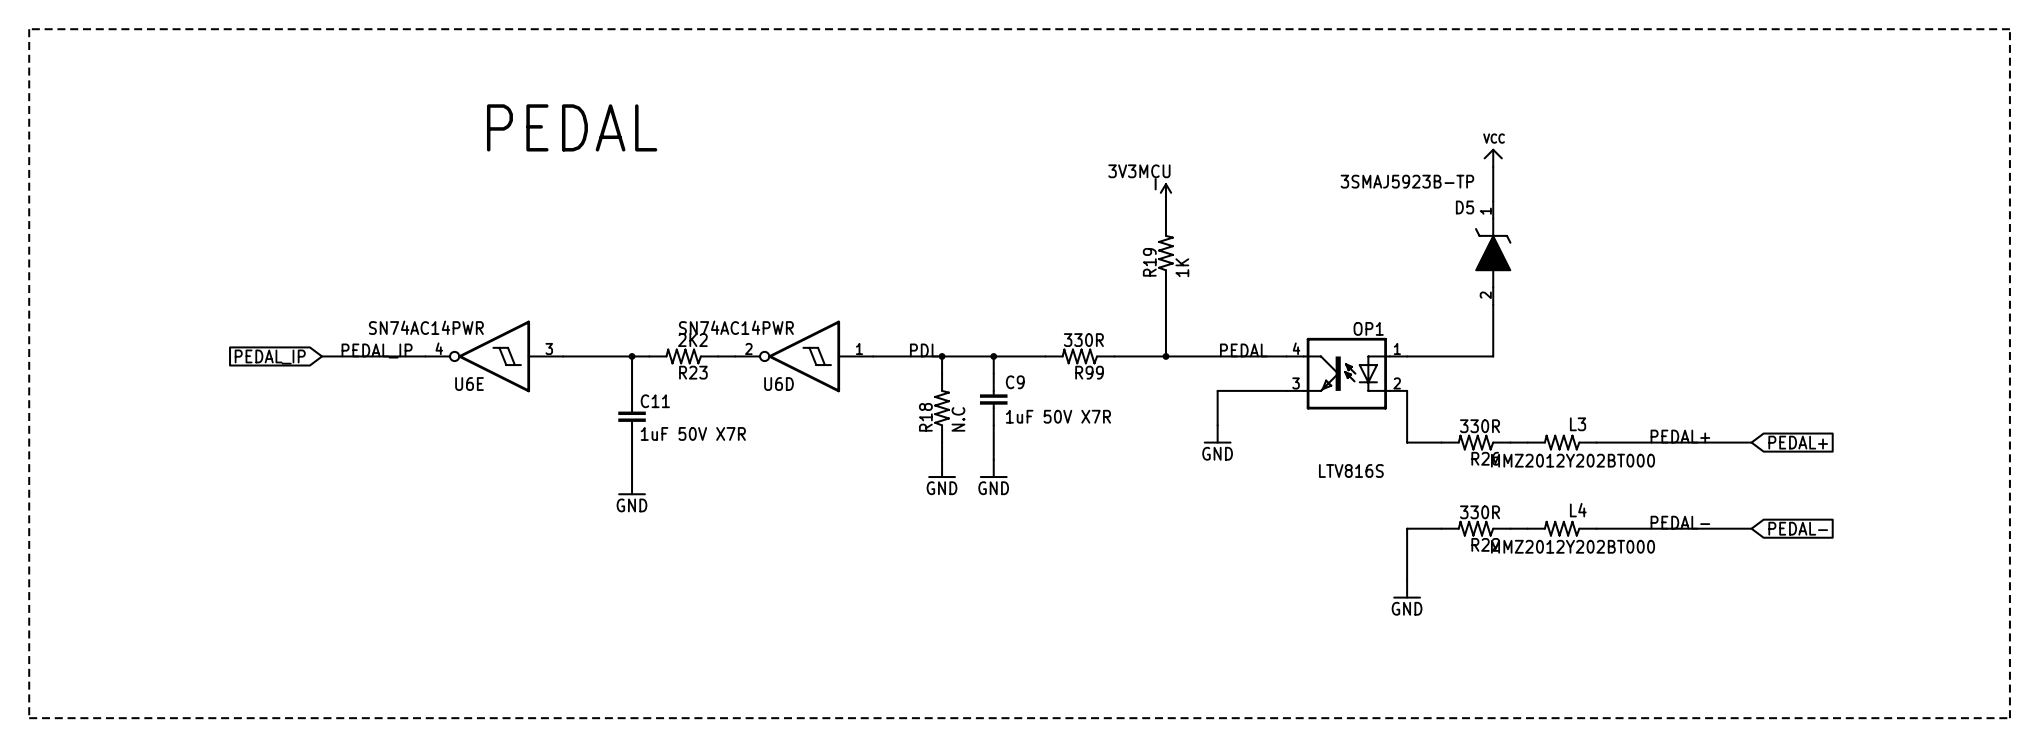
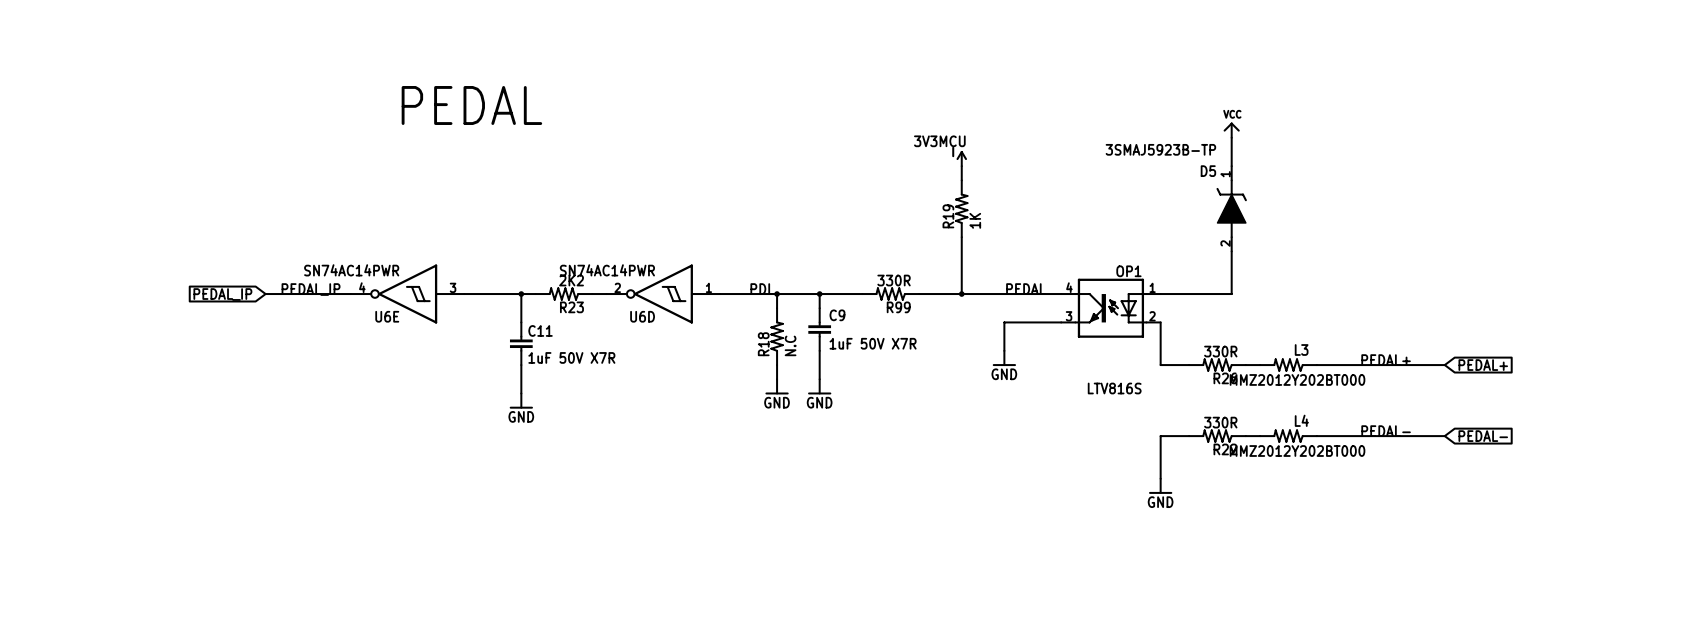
wire: (29, 29) (29, 718) (2009, 718) (2009, 29) (29, 29) -> none

